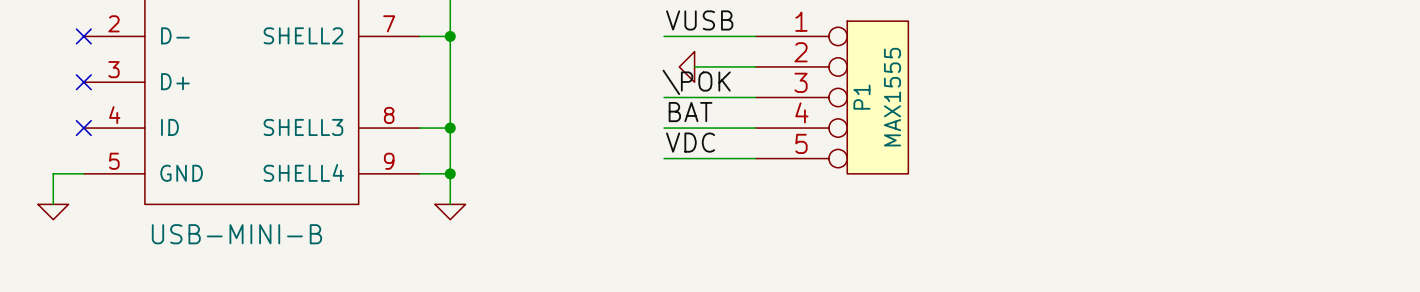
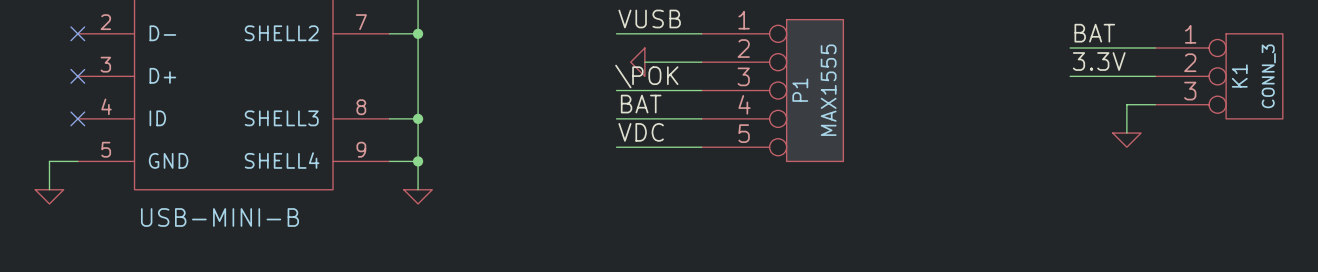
label: none -> BAT (1094, 33)
wire: none -> (1070, 48) (1155, 48)
label: none -> 3.3V (1099, 61)
wire: none -> (1070, 76) (1155, 76)
K1: none -> CONN_3 (1219, 76)
wire: none -> (1155, 104) (1126, 104) (1126, 133)
power symbol: none -> (1126, 140)

